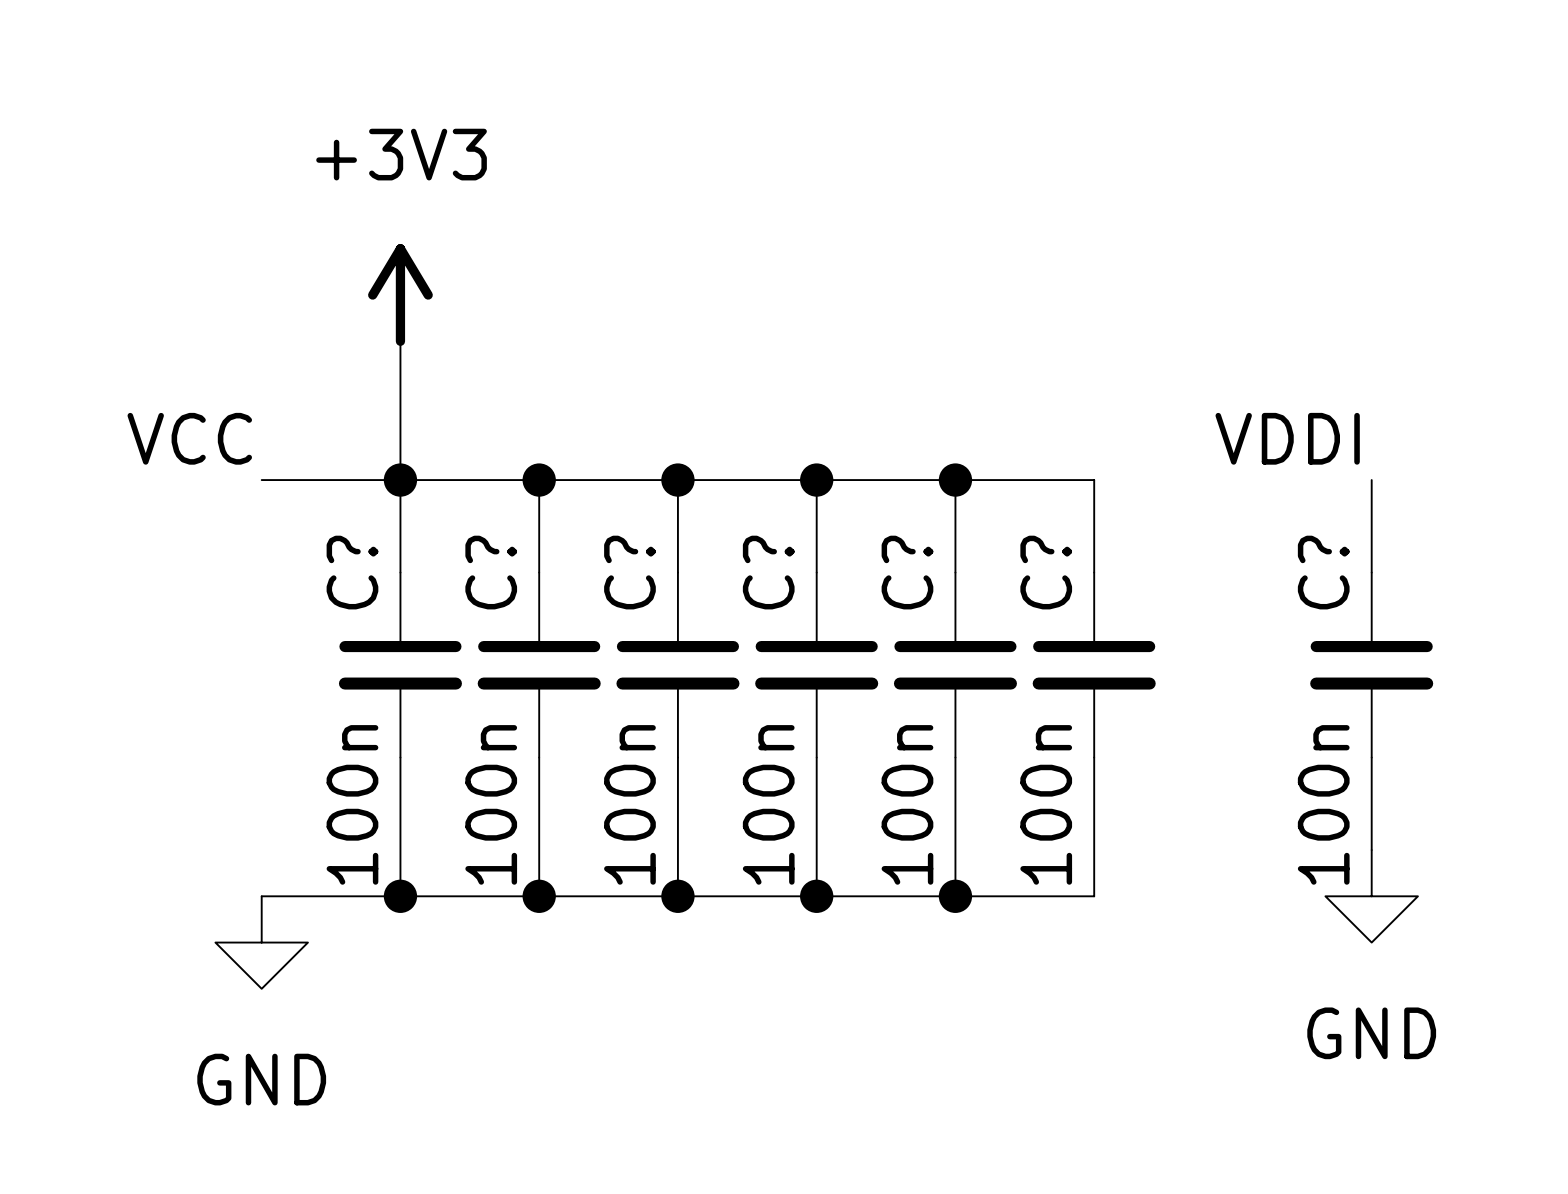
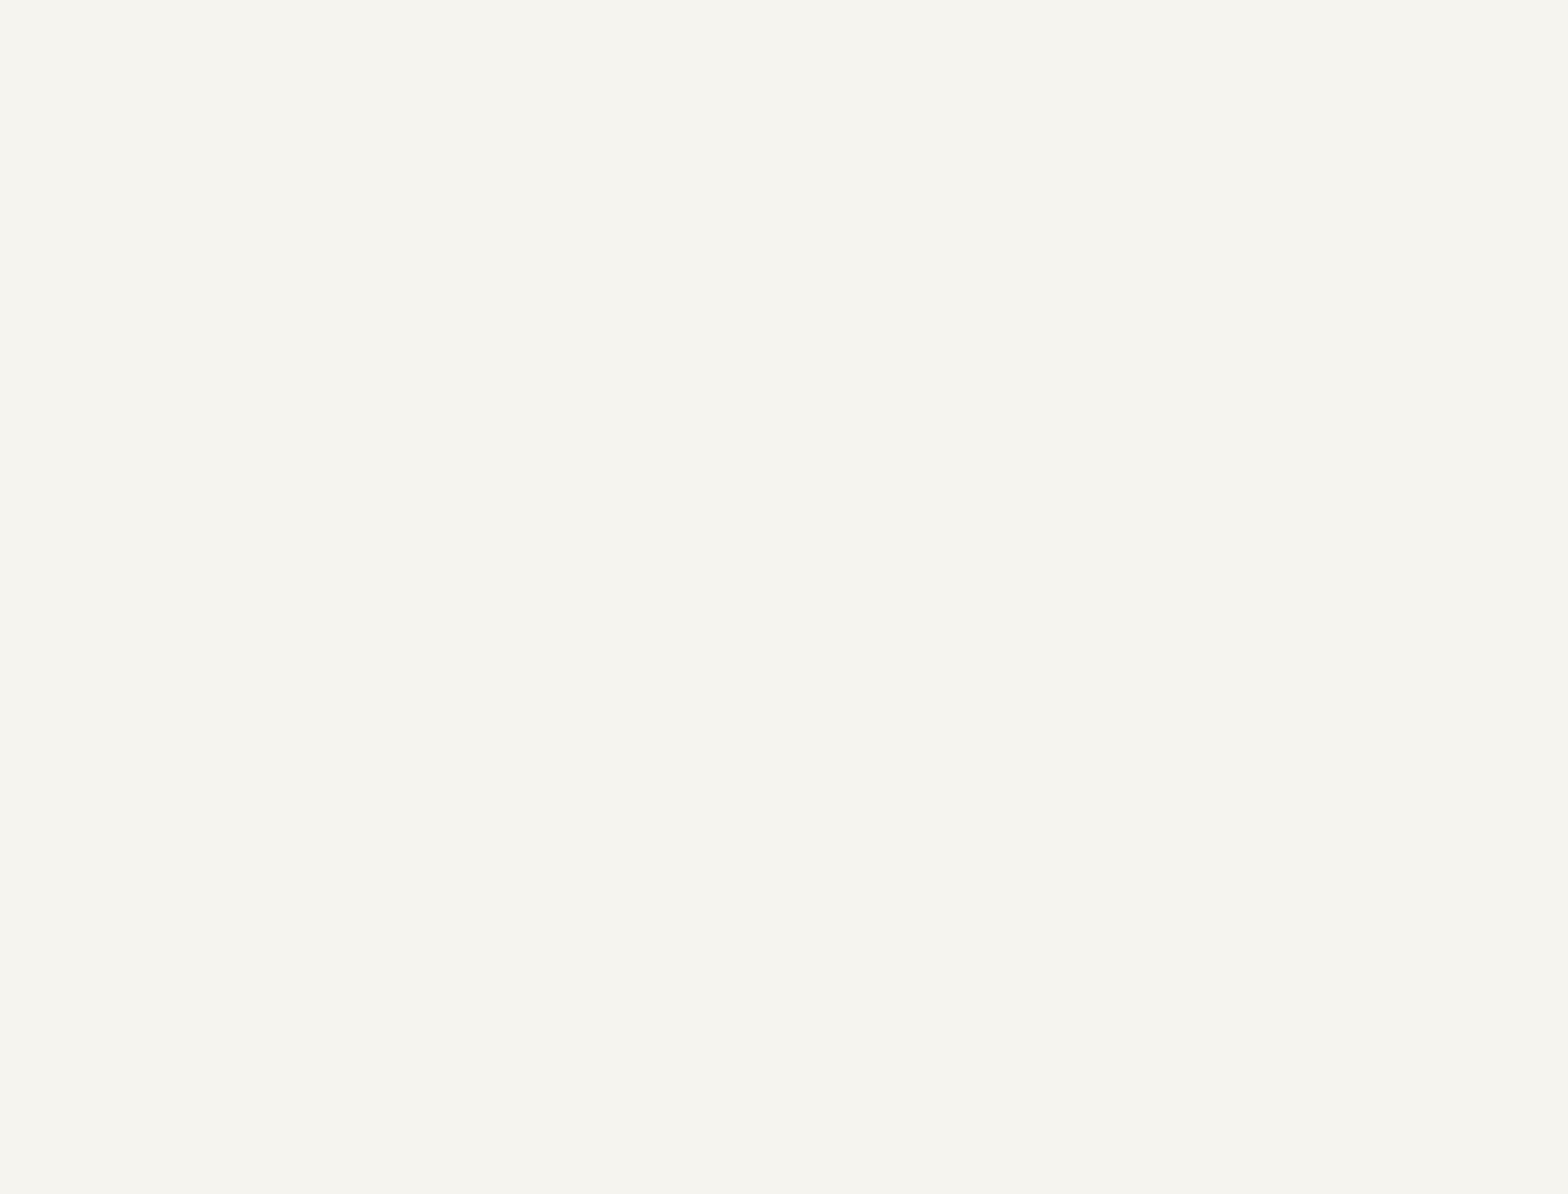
power symbol: +3V3 (400, 295) -> none
wire: (400, 341) (400, 572) -> none
label: VCC (189, 438) -> none
label: VDDI (1287, 438) -> none
wire: (261, 480) (1094, 480) (1094, 572) -> none
junction: (400, 480) -> none
wire: (539, 480) (539, 572) -> none
junction: (539, 480) -> none
wire: (677, 480) (677, 572) -> none
junction: (677, 480) -> none
wire: (816, 480) (816, 572) -> none
junction: (816, 480) -> none
wire: (955, 480) (955, 572) -> none
junction: (955, 480) -> none
wire: (1371, 480) (1371, 572) -> none
C?: (400, 665) -> none
C?: (539, 665) -> none
C?: (677, 665) -> none
C?: (816, 665) -> none
C?: (955, 665) -> none
C?: (1094, 665) -> none
C?: (1371, 665) -> none
wire: (400, 757) (400, 896) -> none
wire: (539, 757) (539, 896) -> none
wire: (677, 757) (677, 896) -> none
wire: (816, 757) (816, 896) -> none
wire: (955, 757) (955, 896) -> none
wire: (1094, 757) (1094, 896) (261, 896) -> none
wire: (1371, 757) (1371, 850) -> none
junction: (400, 896) -> none
junction: (539, 896) -> none
junction: (677, 896) -> none
junction: (816, 896) -> none
junction: (955, 896) -> none
power symbol: GND (1371, 896) -> none
power symbol: GND (261, 942) -> none

